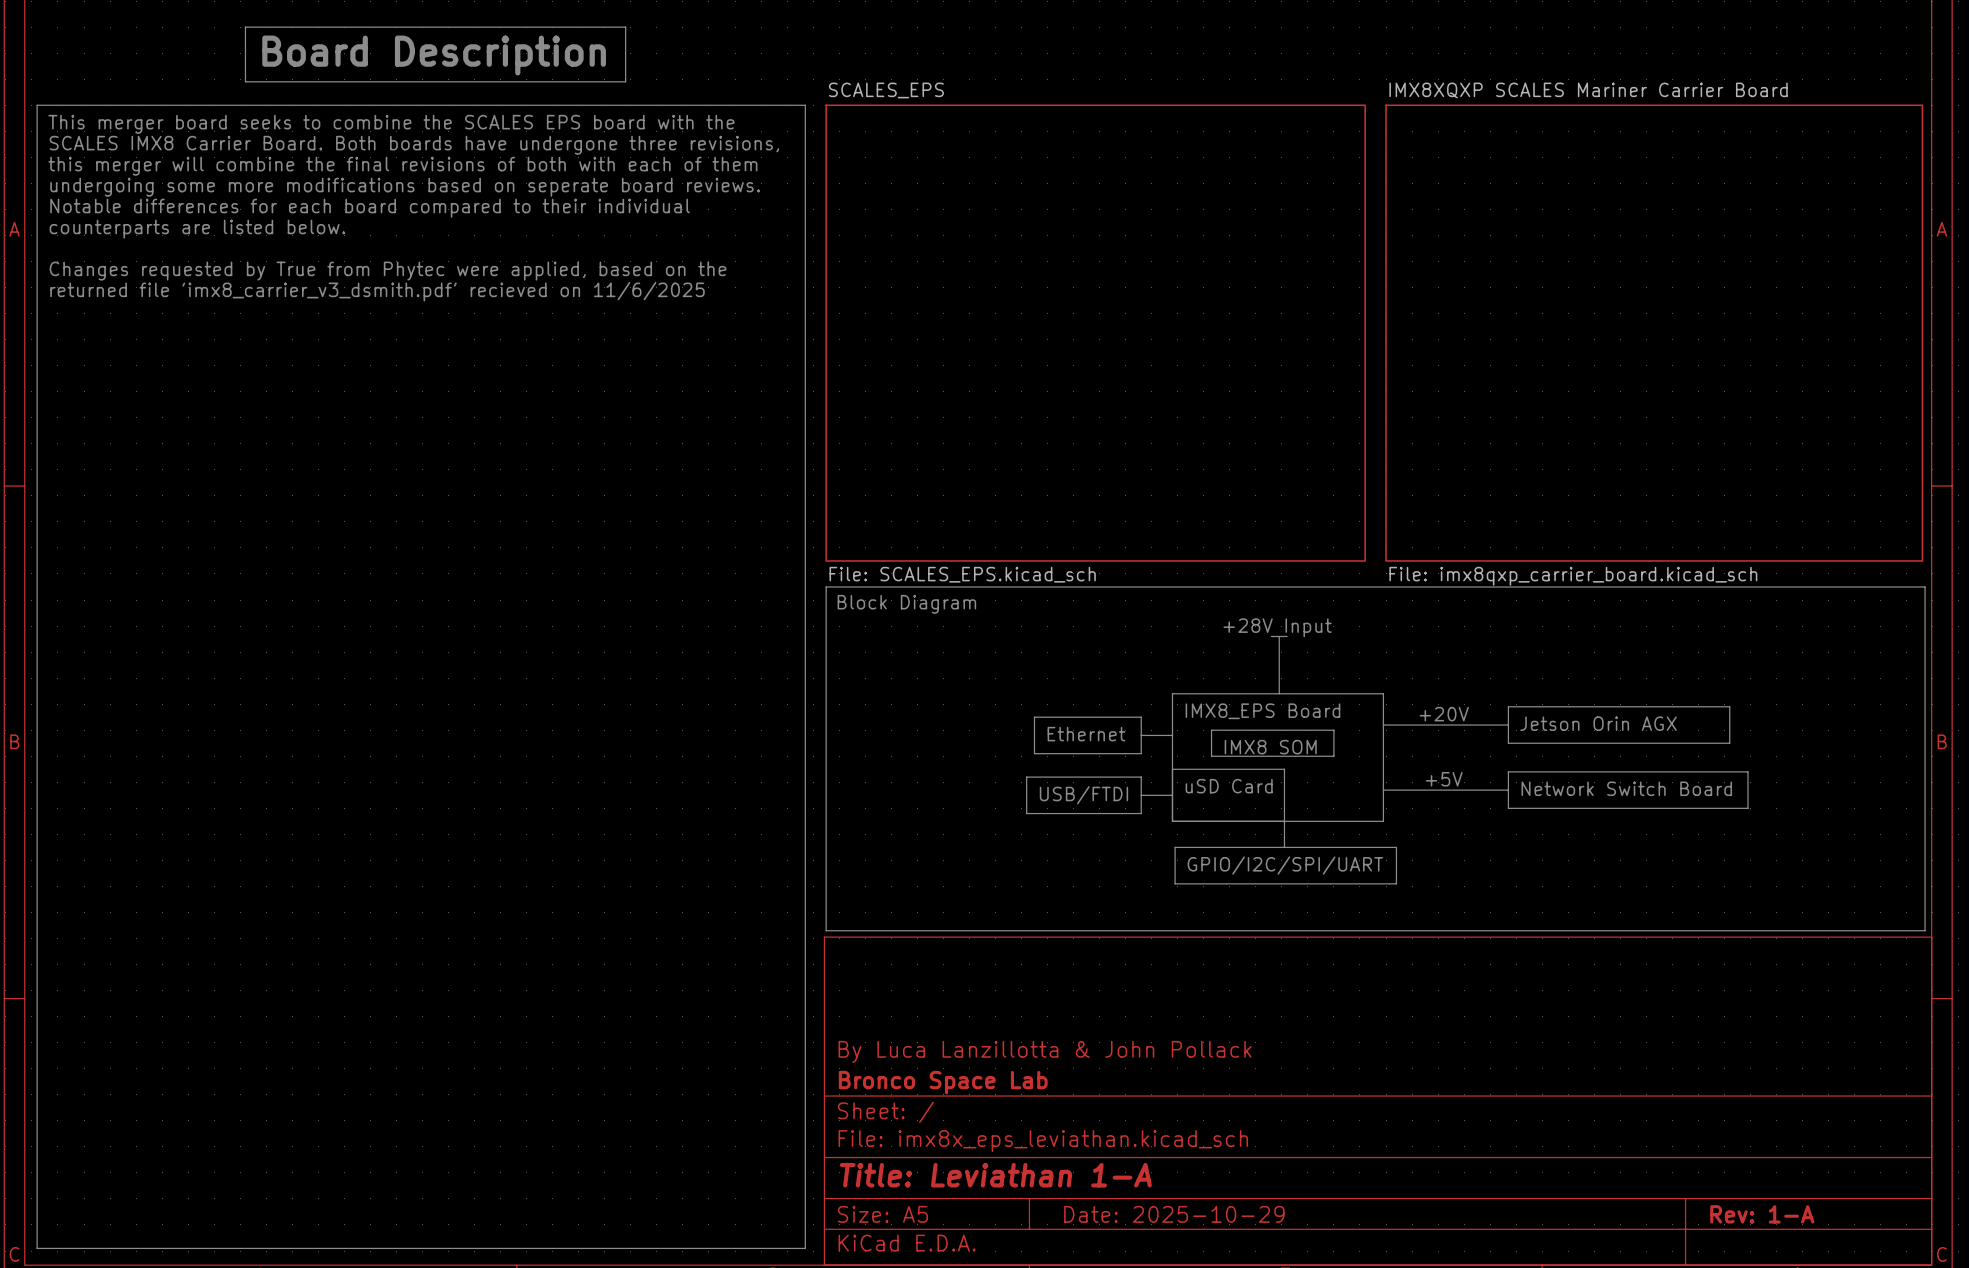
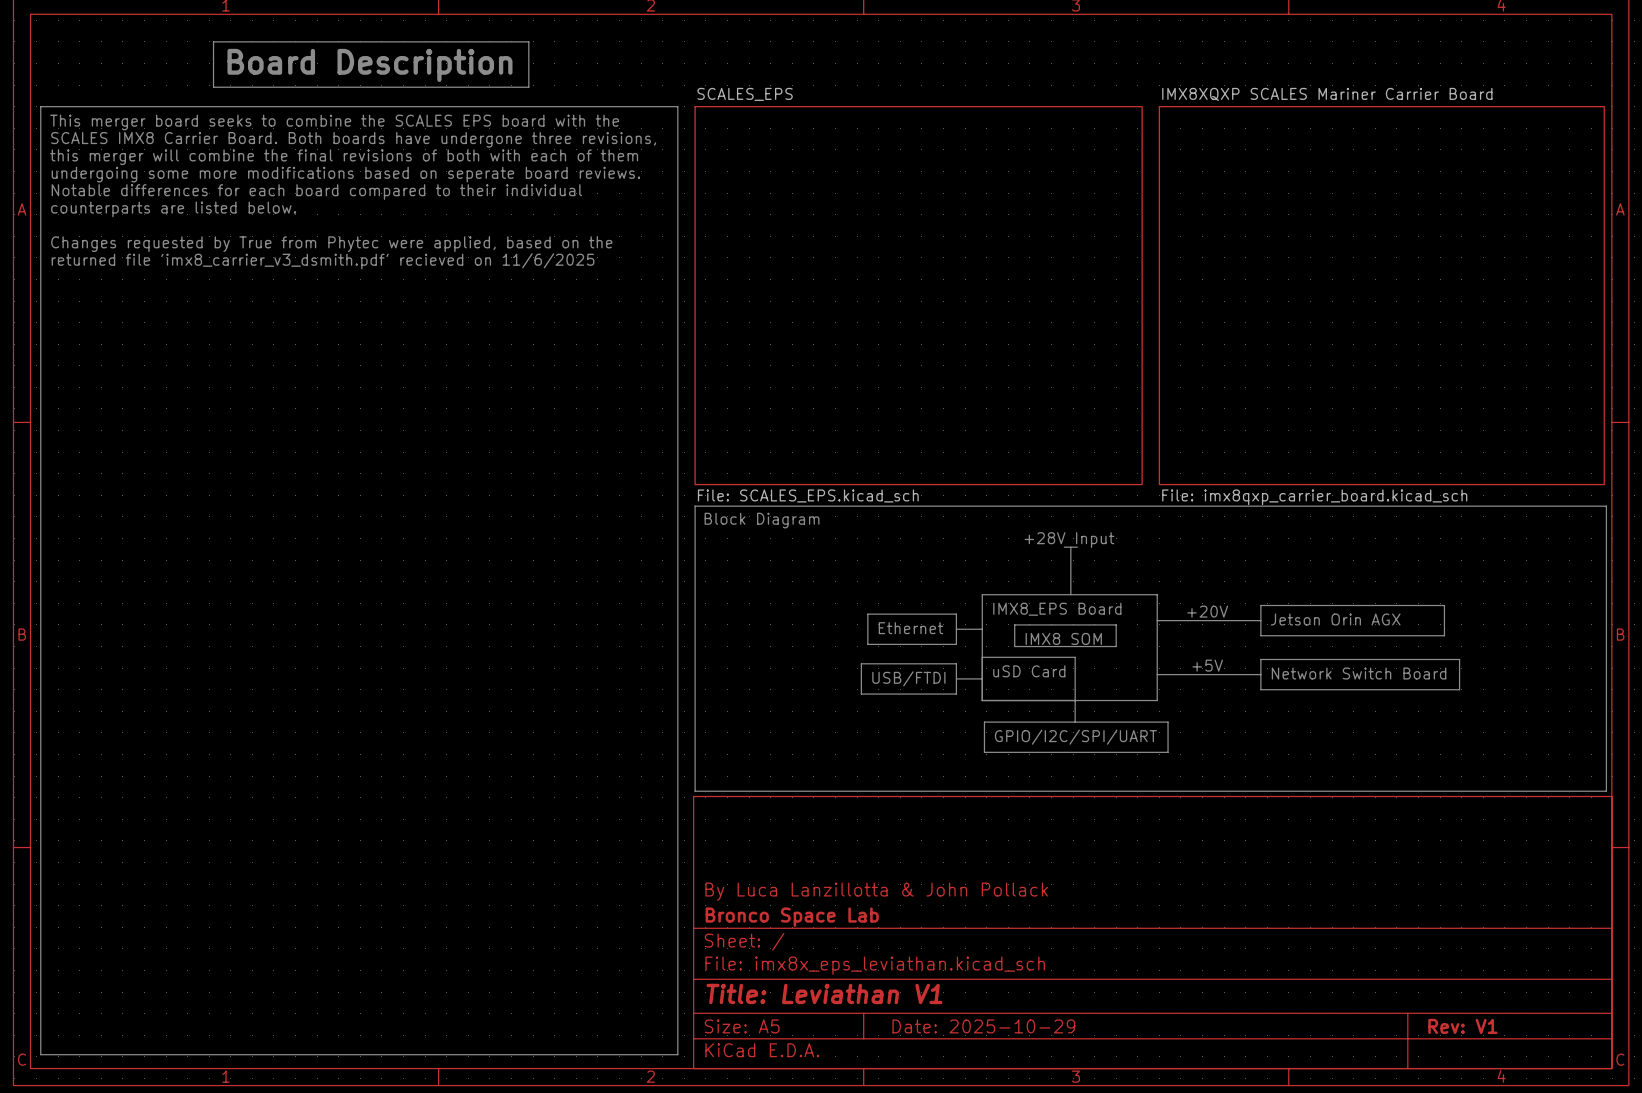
title block: Title: Leviathan 1-A (995, 1175) -> Title: Leviathan V1 (824, 993)
title block: Rev: 1-A (1762, 1214) -> Rev: V1 (1462, 1026)

